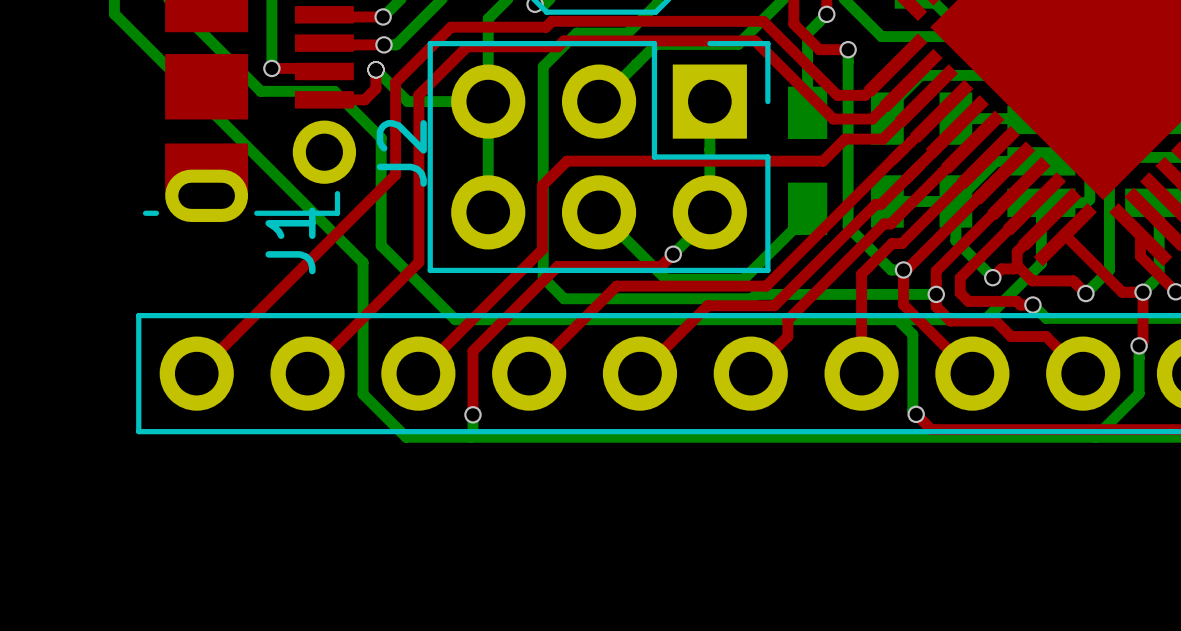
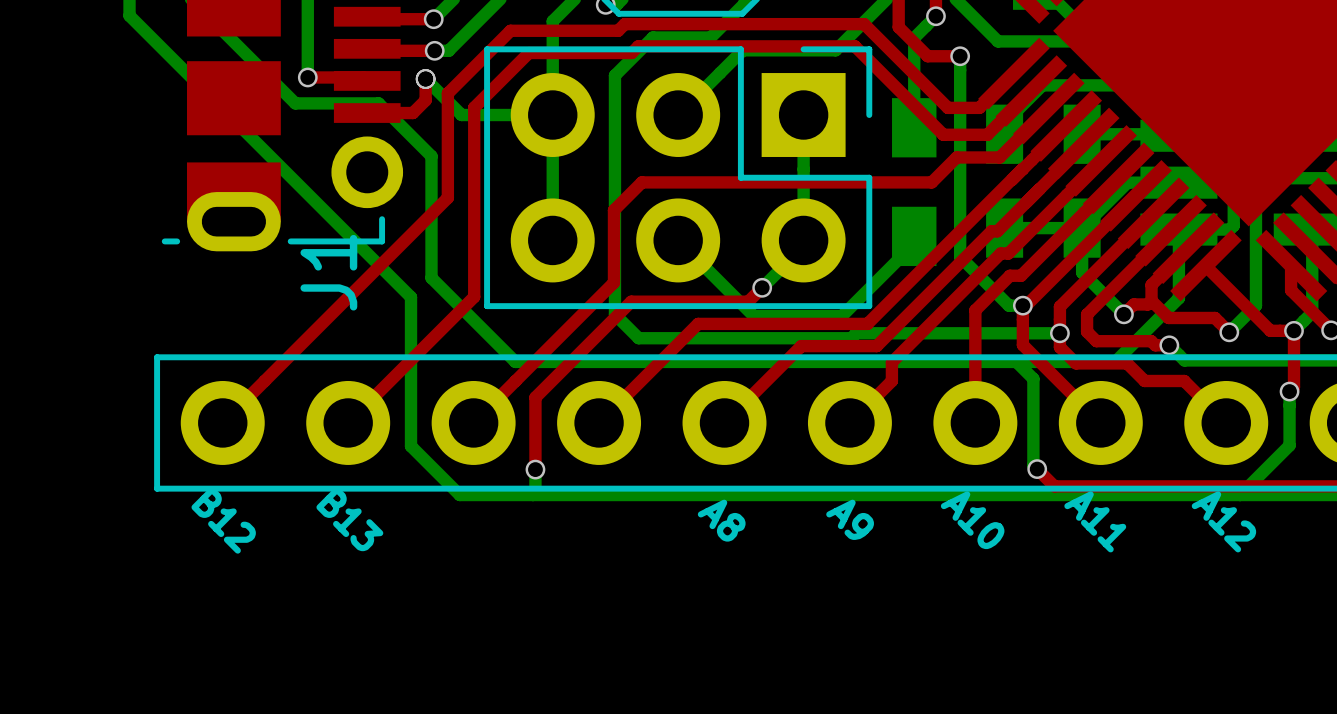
J2 name: J2 (401, 153) -> none
text: none -> B13 (349, 518)
text: none -> B12 (223, 520)
text: none -> A8 (721, 520)
text: none -> A9 (850, 519)
text: none -> A10 (972, 520)
text: none -> A11 (1095, 521)
text: none -> A12 (1223, 521)

